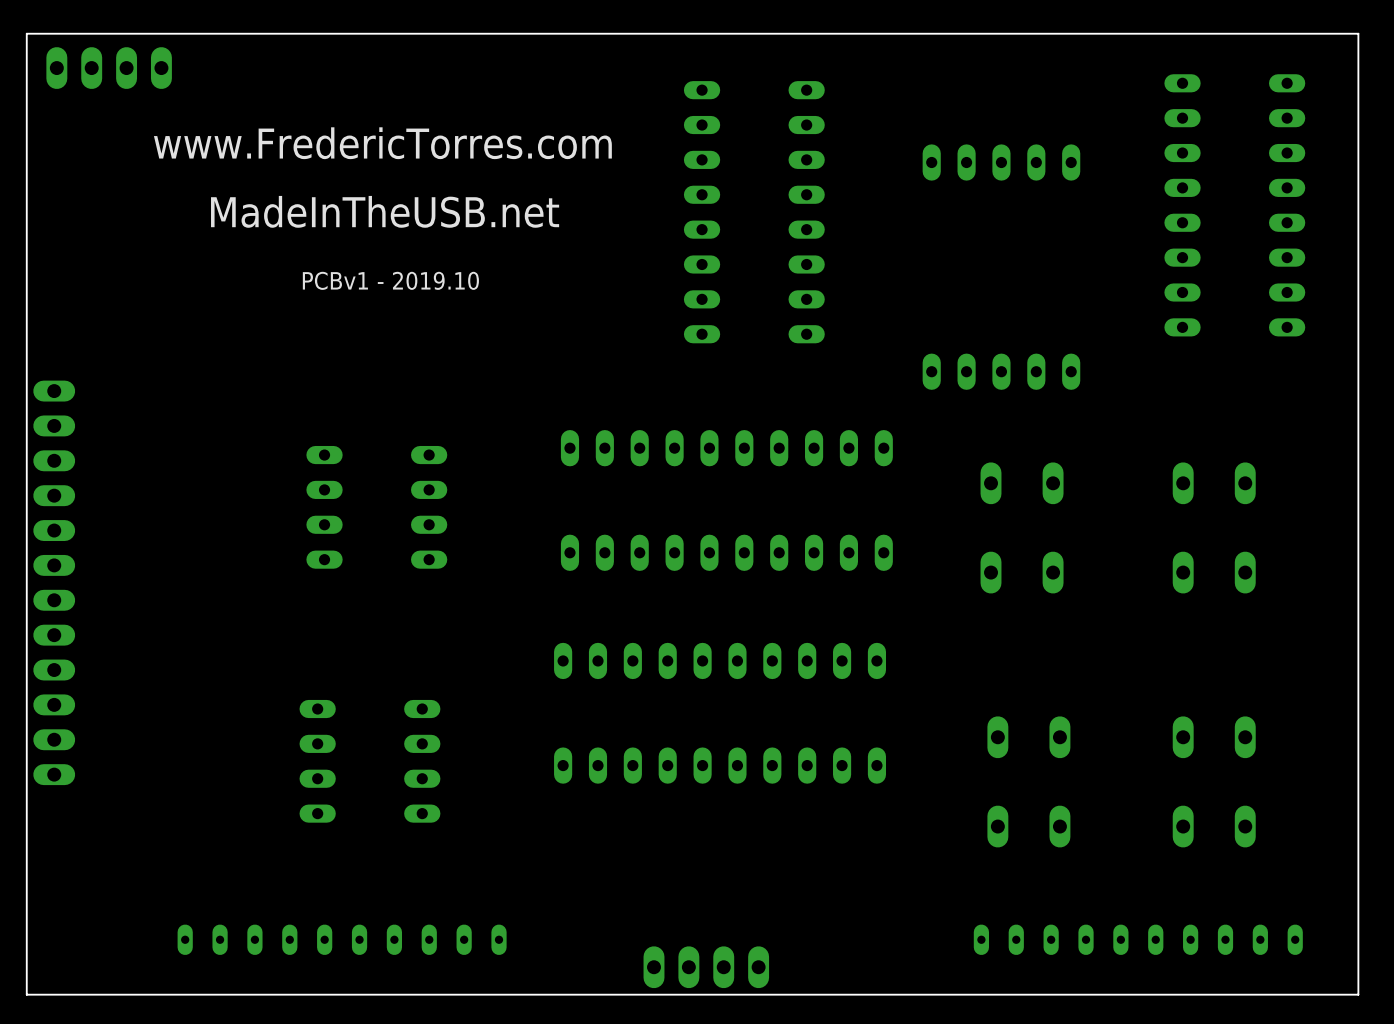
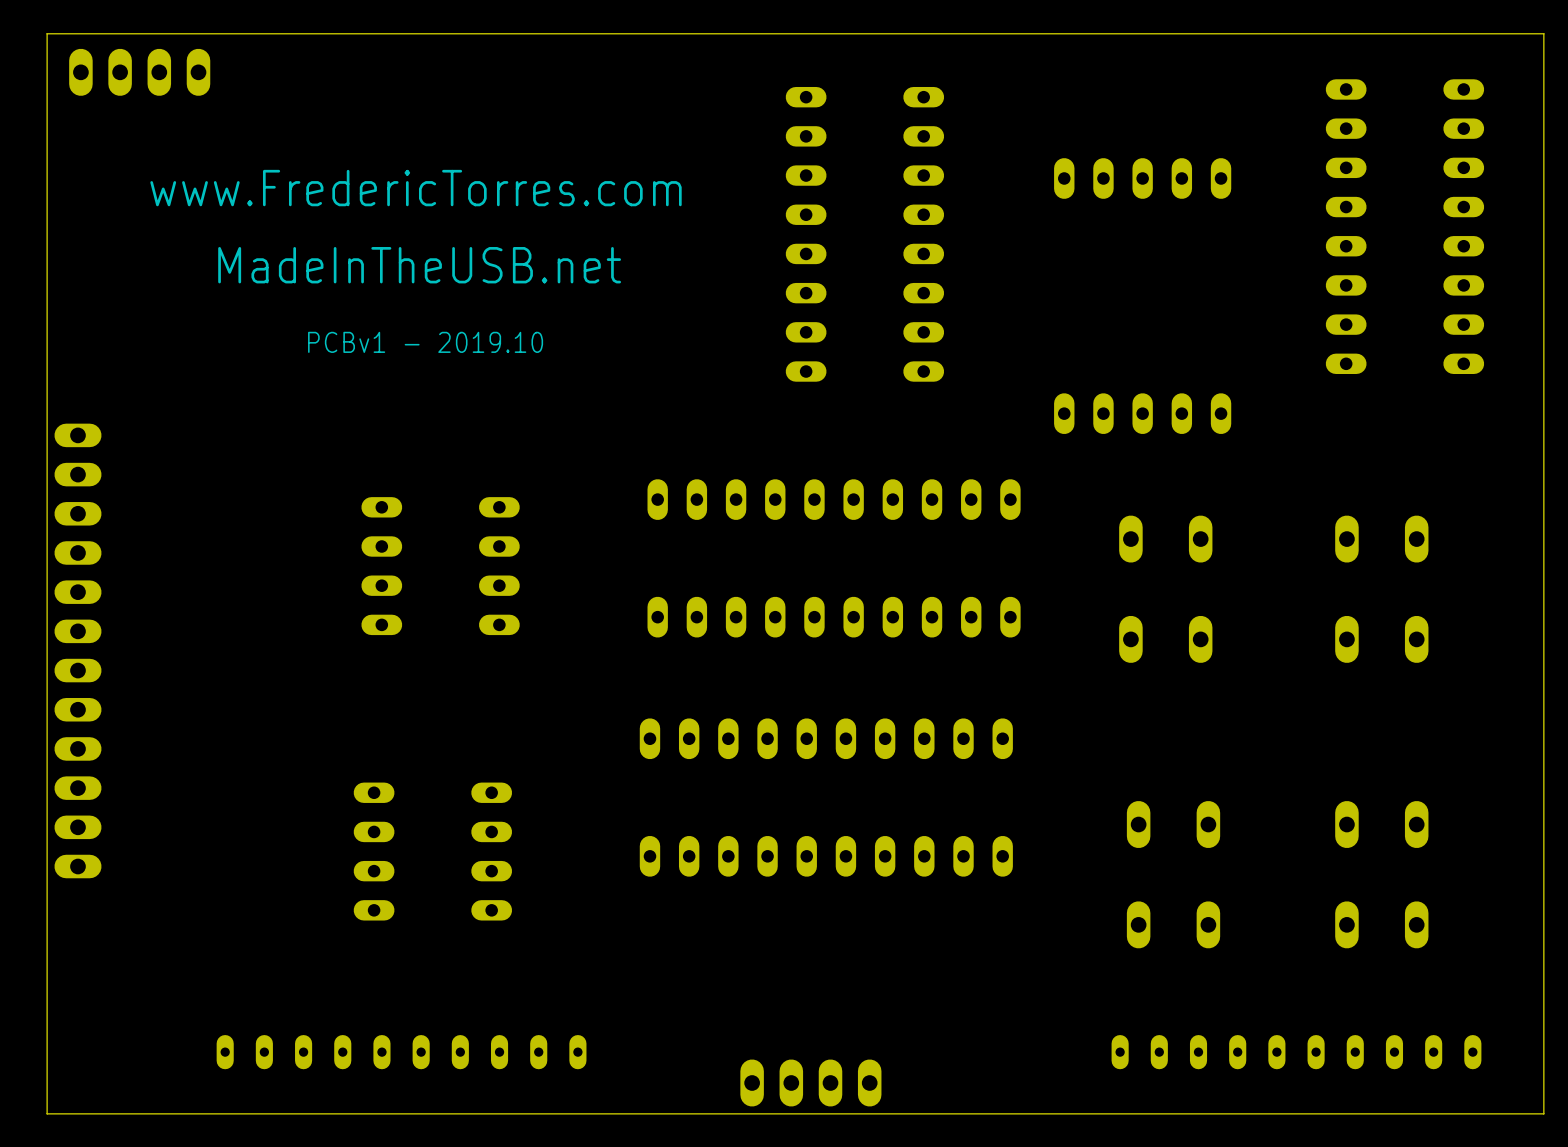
text position: www.FredericTorres.com (382, 143) -> www.FredericTorres.com (416, 188)
text position: MadeInTheUSB.net (385, 211) -> MadeInTheUSB.net (419, 265)
text position: PCBv1 - 2019.10 (390, 280) -> PCBv1 - 2019.10 (425, 342)

